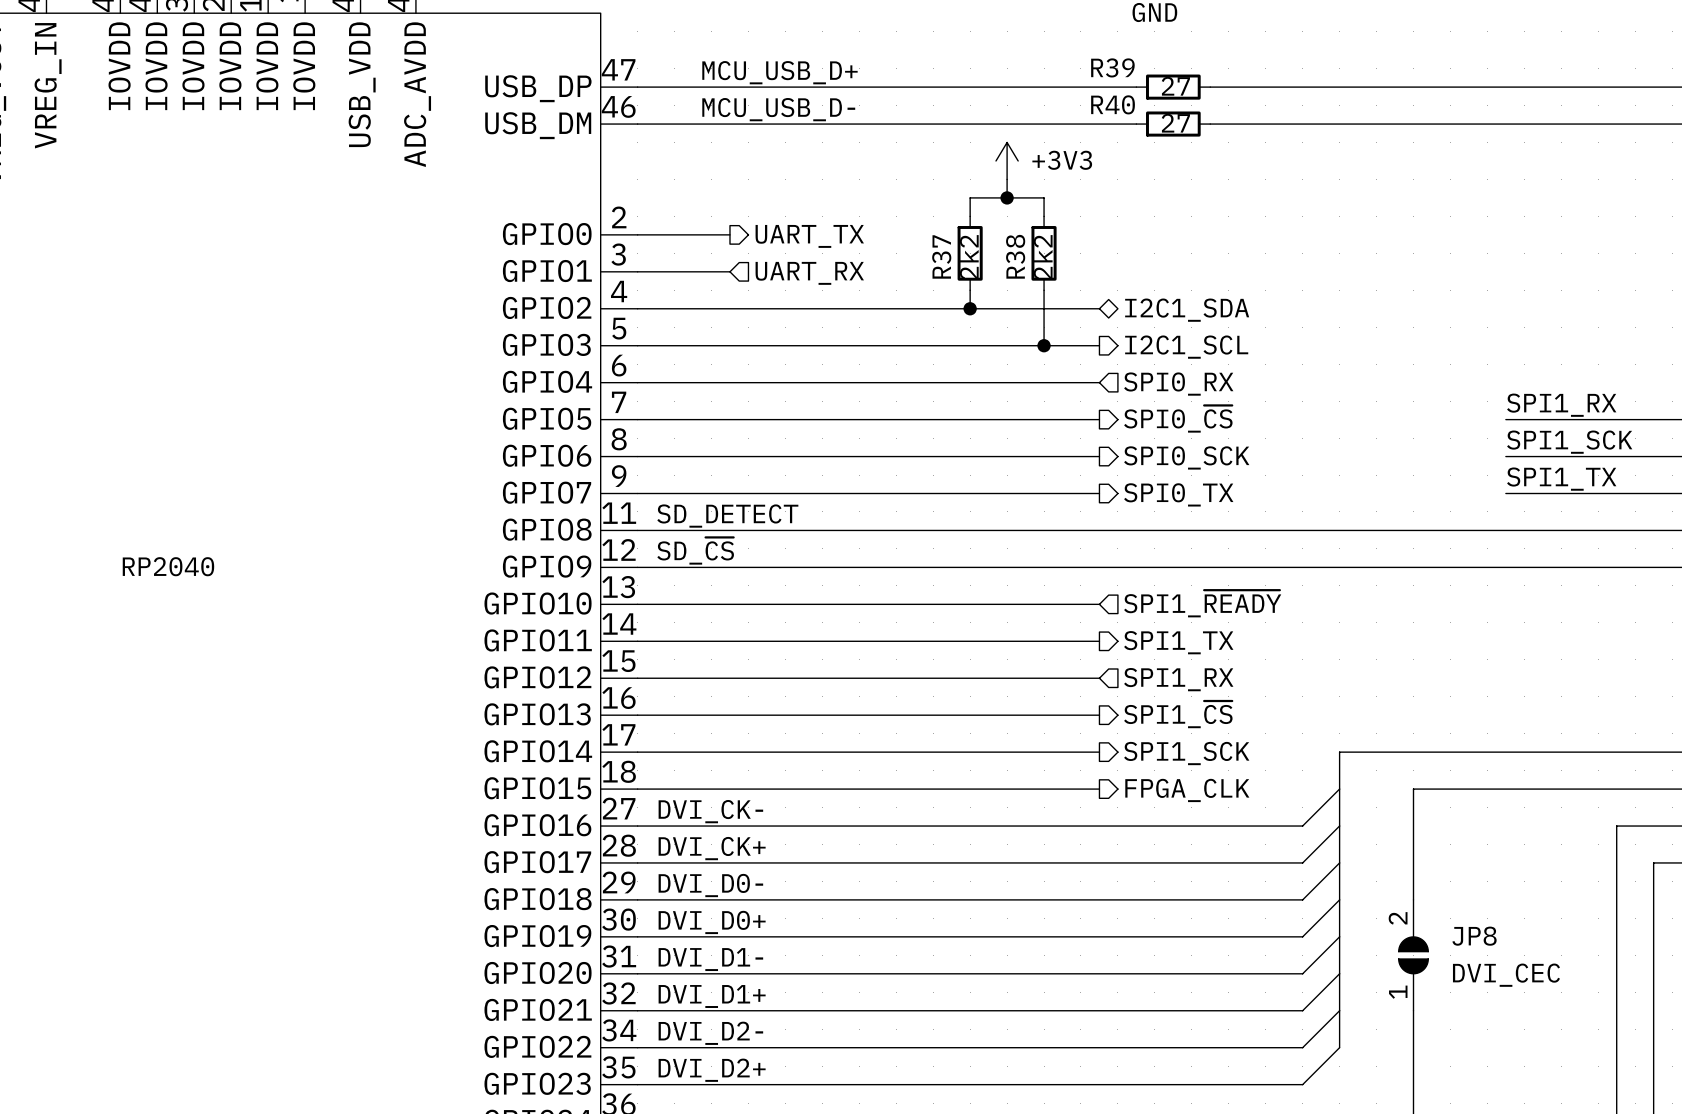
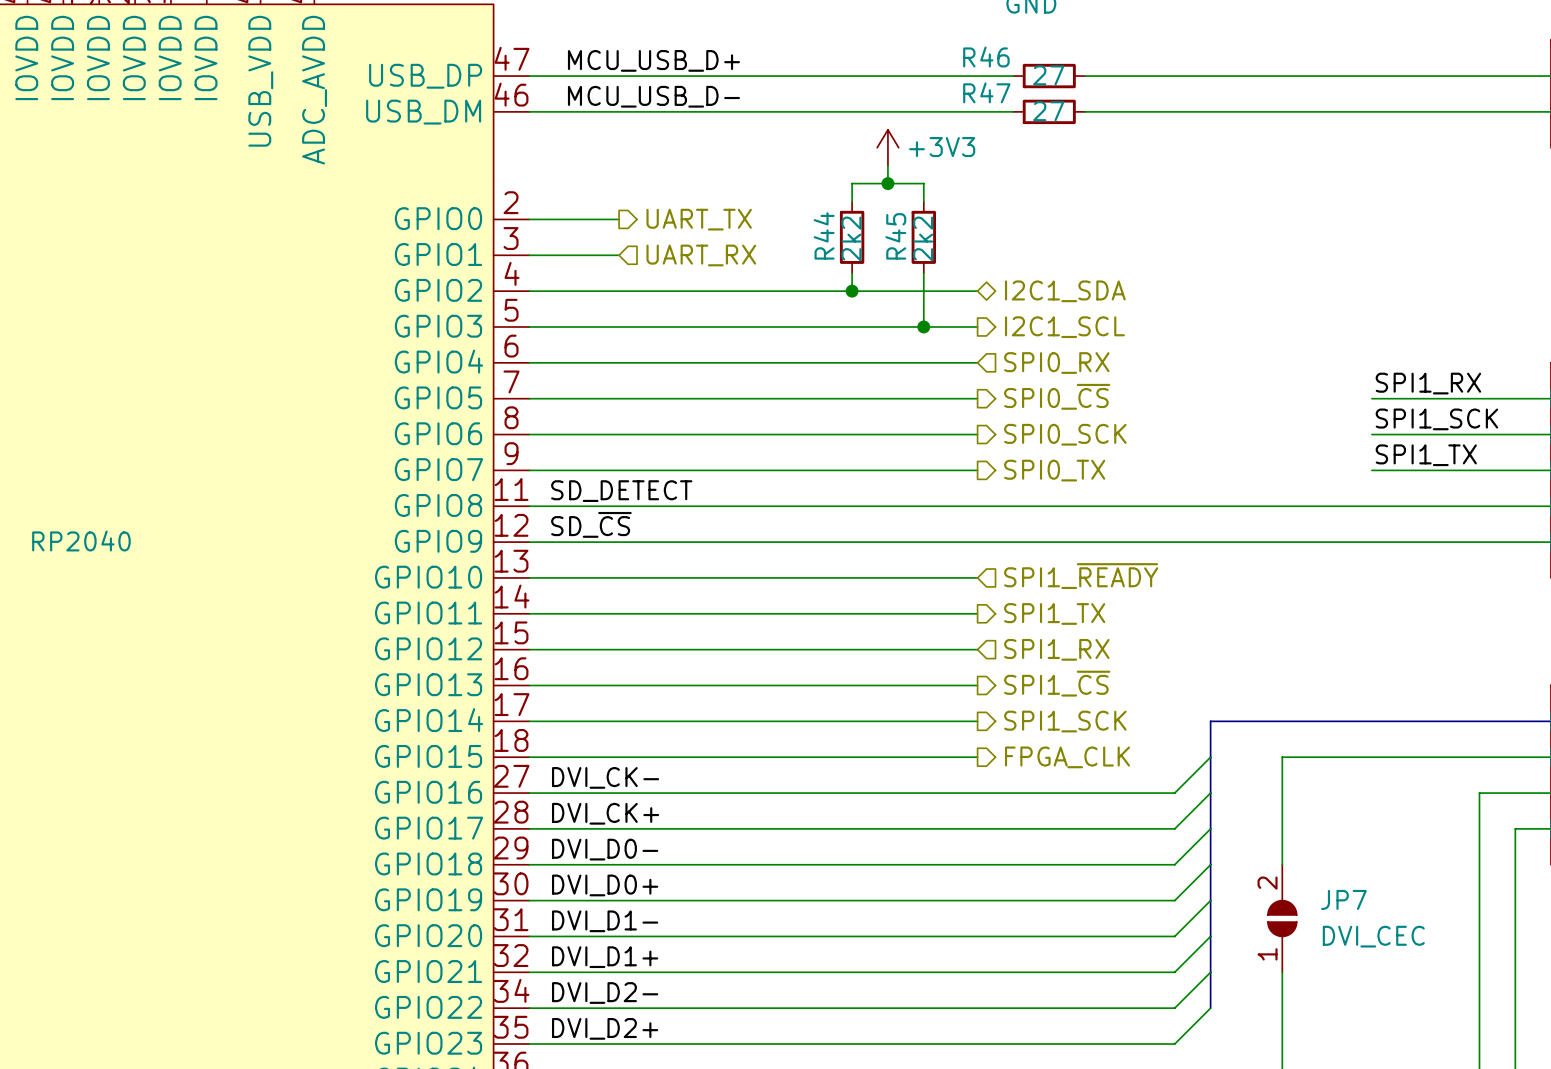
R39 name: R39 (1112, 67) -> R46 (986, 57)
R40 name: R40 (1113, 104) -> R47 (986, 92)
R37 name: R37 (941, 256) -> R44 (824, 235)
R38 name: R38 (1015, 256) -> R45 (895, 236)
JP8 name: JP8 (1474, 936) -> JP7 (1343, 899)

